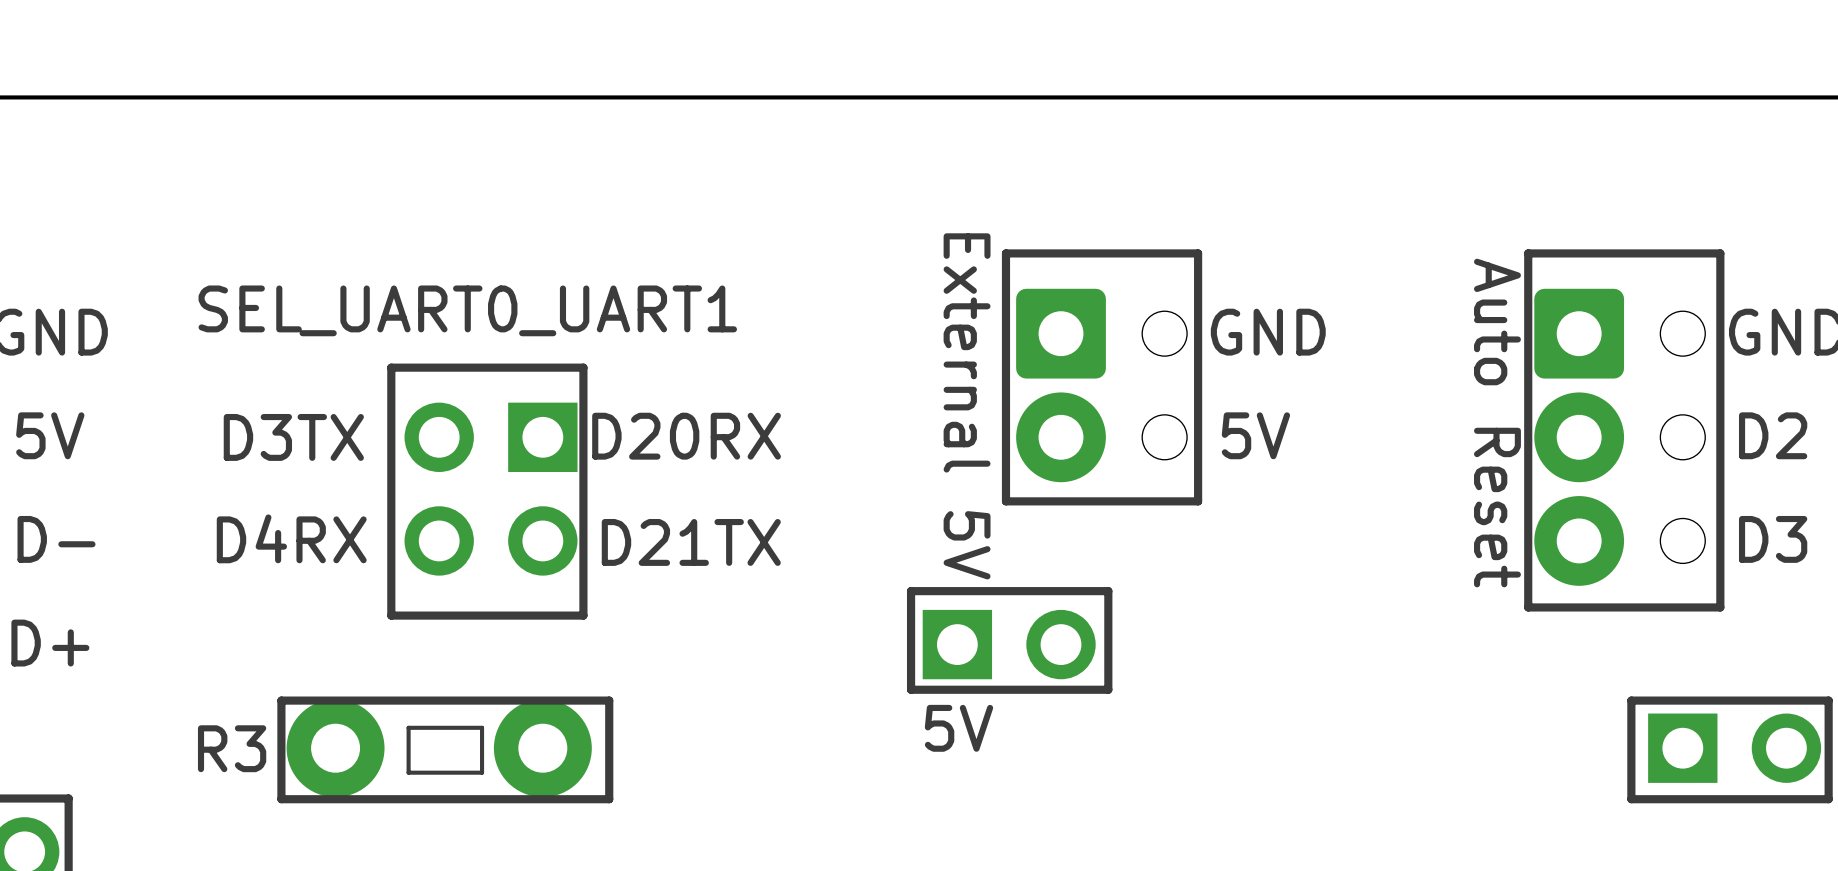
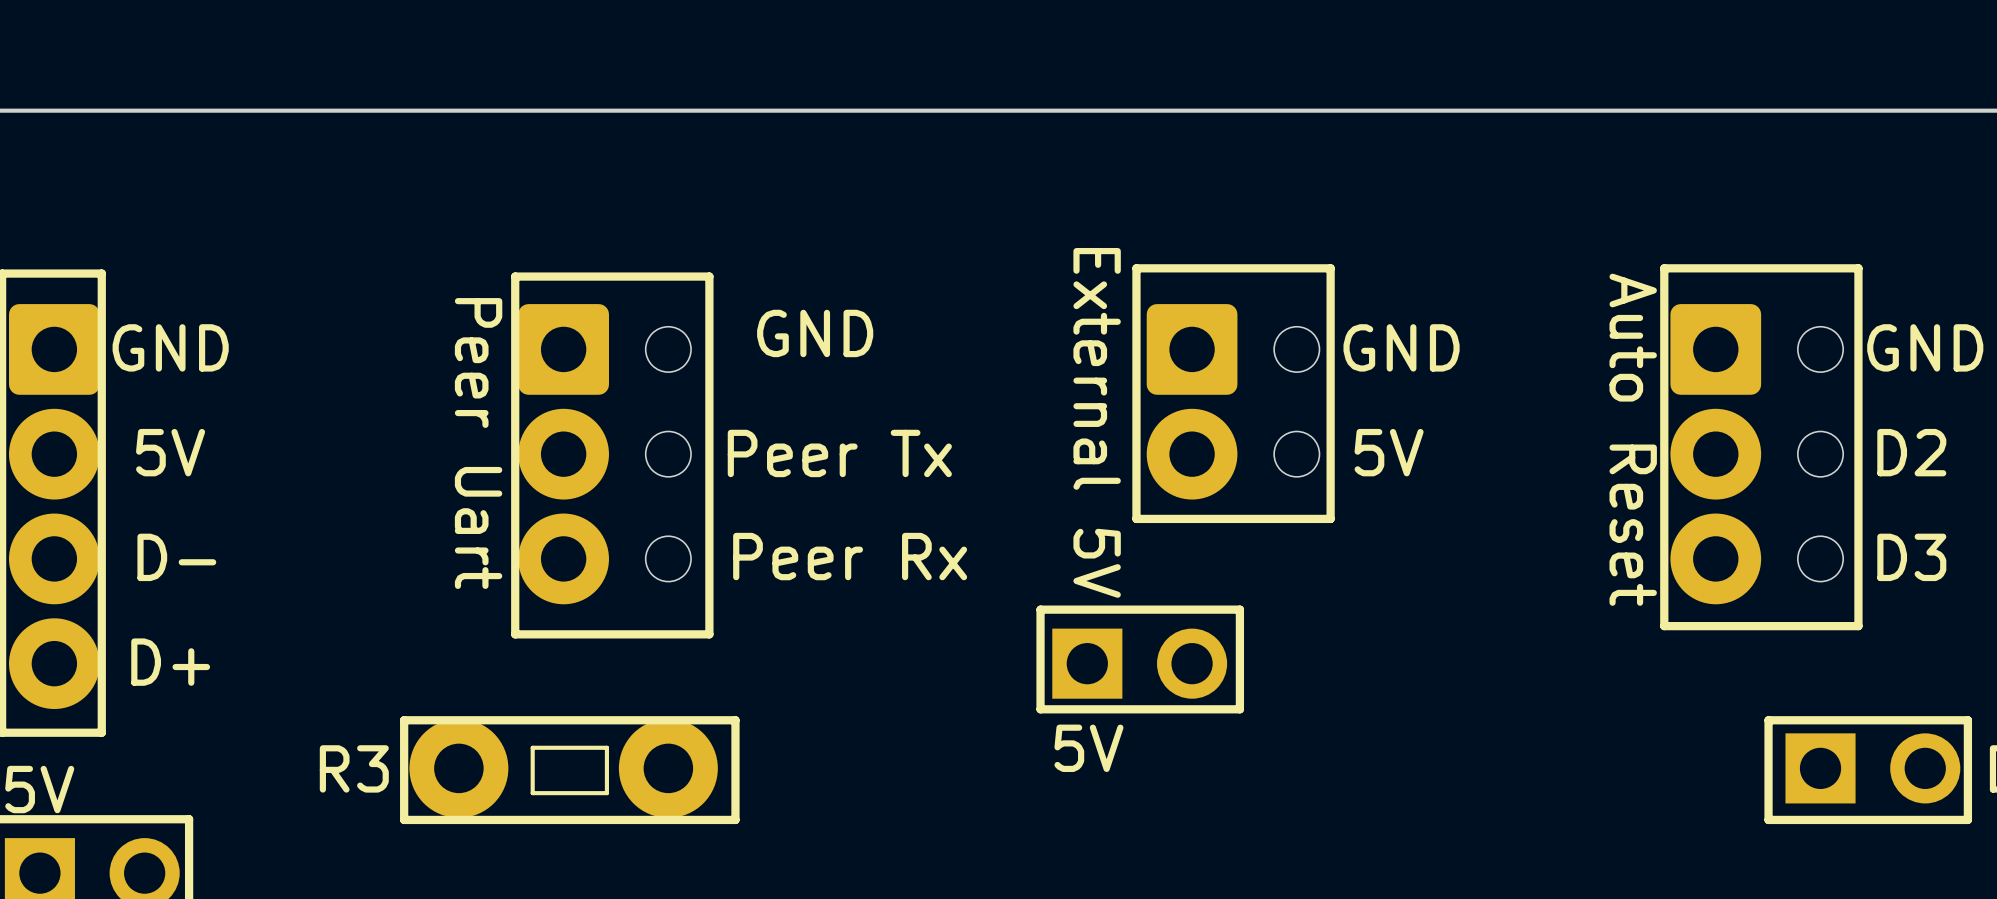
text: SEL_UART0_UART1 (467, 310) -> none
text: none -> GND (815, 333)
line: (583, 367) (391, 367) -> (709, 383) (709, 276) (515, 276) (515, 383)
text: none -> Peer Uart (478, 443)
text: D20RX (686, 436) -> Peer Tx (839, 453)
text: D3TX (293, 437) -> none
part: none -> (604, 454)
part: (491, 489) -> none
text: D4RX (291, 538) -> none
text: D21TX (691, 542) -> Peer Rx (850, 556)

